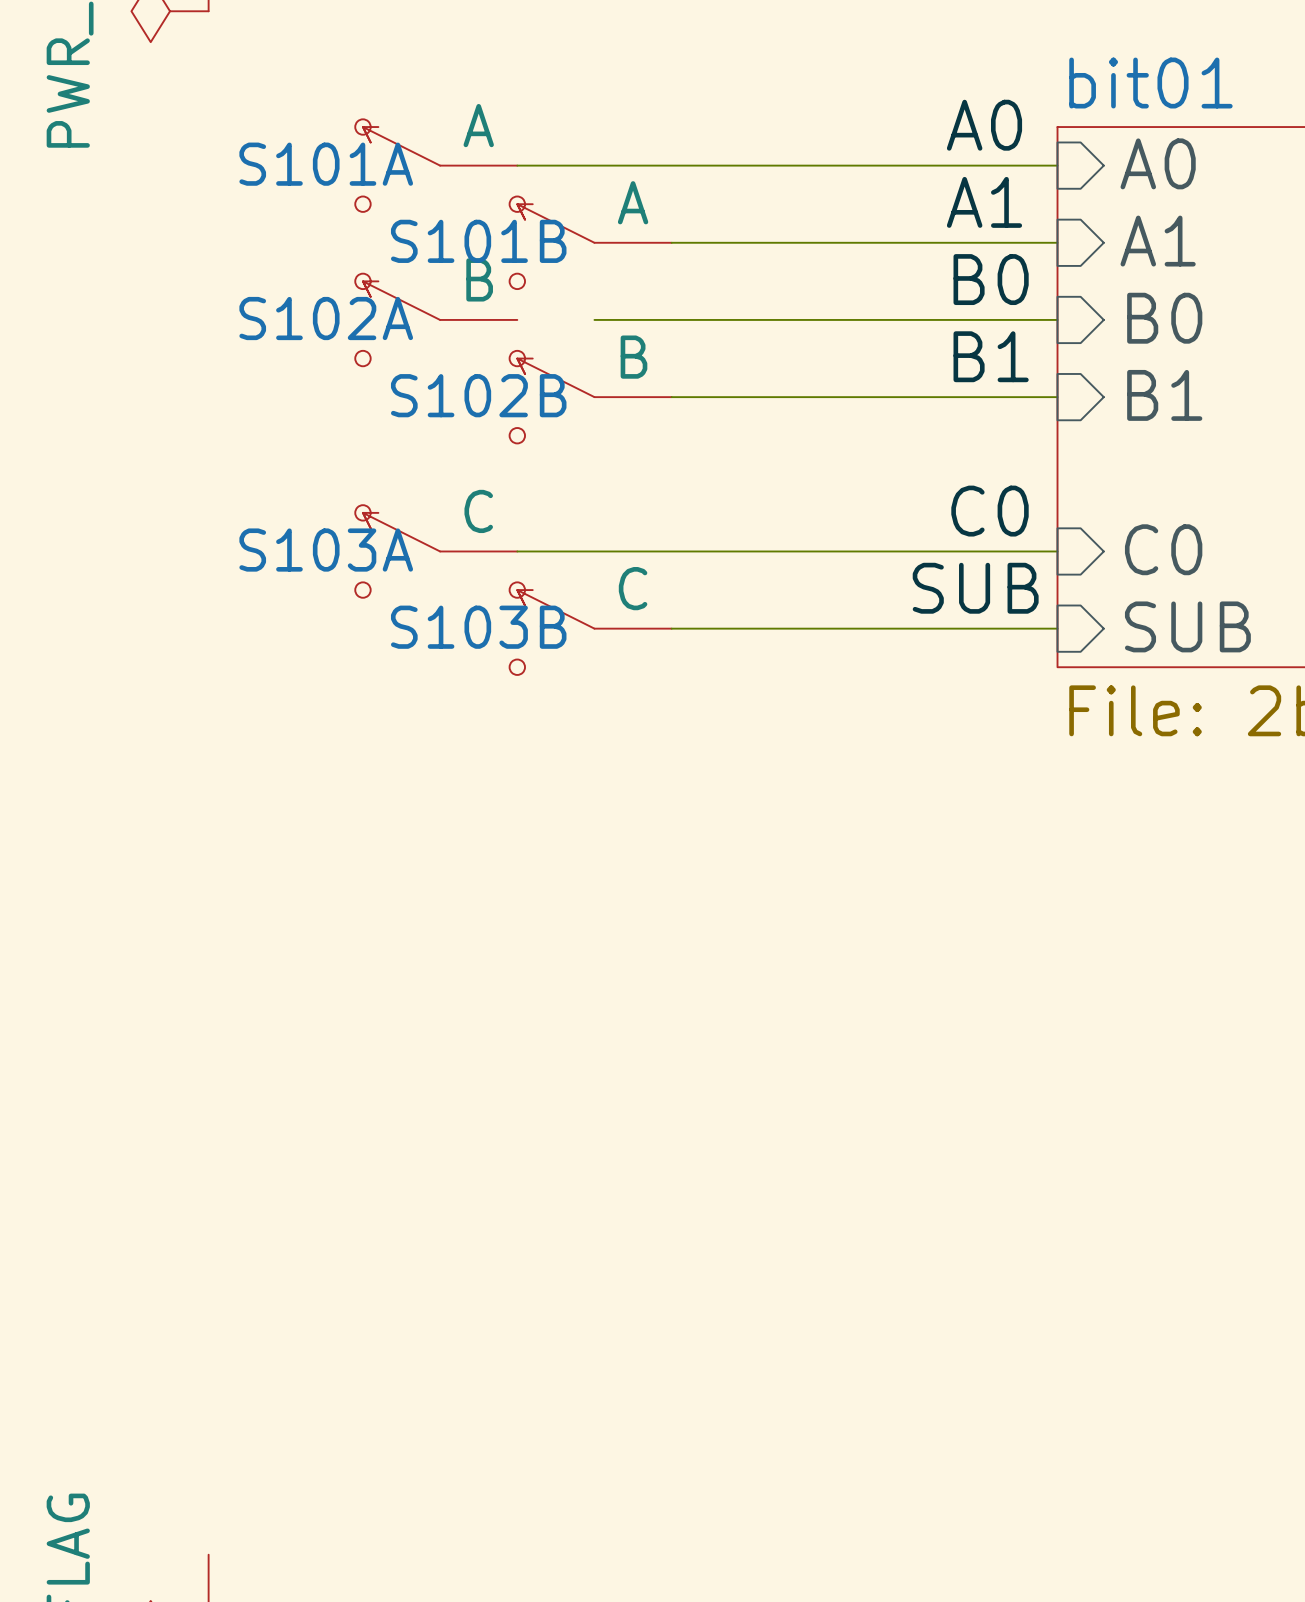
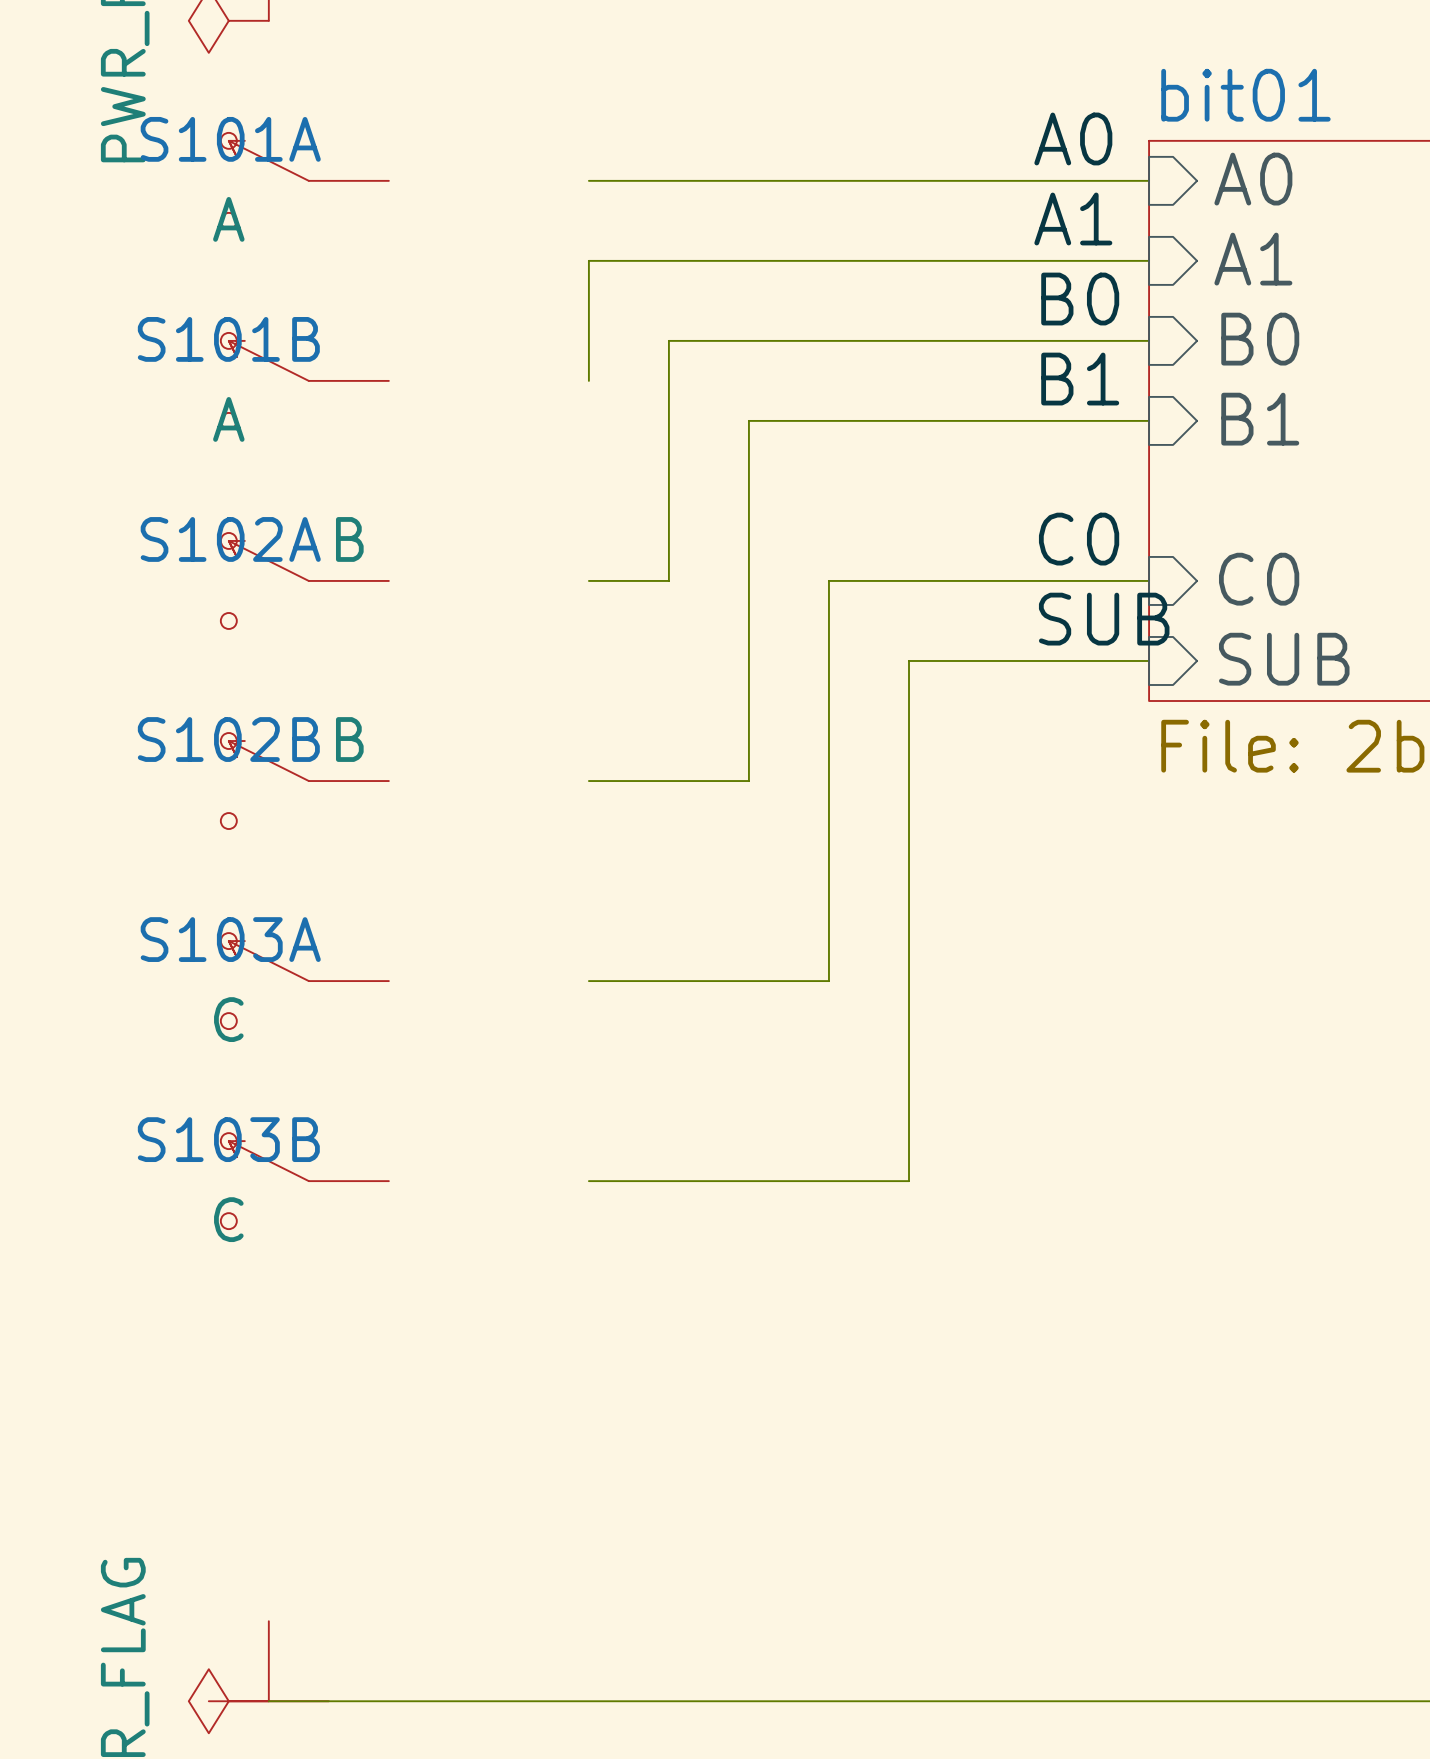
S101A value position: A (478, 125) -> A (228, 219)
S101A name position: S101A (326, 164) -> S101A (230, 139)
S101A position: (436, 165) -> (304, 180)
S101B value position: A (633, 202) -> A (228, 419)
S101B name position: S101B (478, 241) -> S101B (228, 339)
S101B position: (590, 242) -> (304, 380)
wire: none -> (748, 260) (588, 260) (588, 380)
S102A name position: S102A (326, 318) -> S102A (230, 539)
S102A position: (436, 319) -> (304, 580)
S102B name position: S102B (478, 395) -> S102B (228, 739)
S102B position: (590, 397) -> (304, 781)
wire: none -> (748, 420) (748, 781) (588, 781)
S103A value position: C (478, 511) -> C (228, 1019)
S103A name position: S103A (326, 550) -> S103A (230, 939)
S103A position: (436, 551) -> (304, 981)
wire: (594, 551) (748, 551) -> (668, 580) (668, 340)
wire: none -> (828, 580) (828, 981) (588, 981)
S103B value position: C (633, 588) -> C (228, 1219)
label position: SUB (975, 588) -> SUB (1104, 619)
S103B name position: S103B (478, 627) -> S103B (228, 1139)
S103B position: (590, 628) -> (304, 1181)
wire: (671, 628) (825, 628) -> (588, 1181) (909, 1181) (909, 660)

